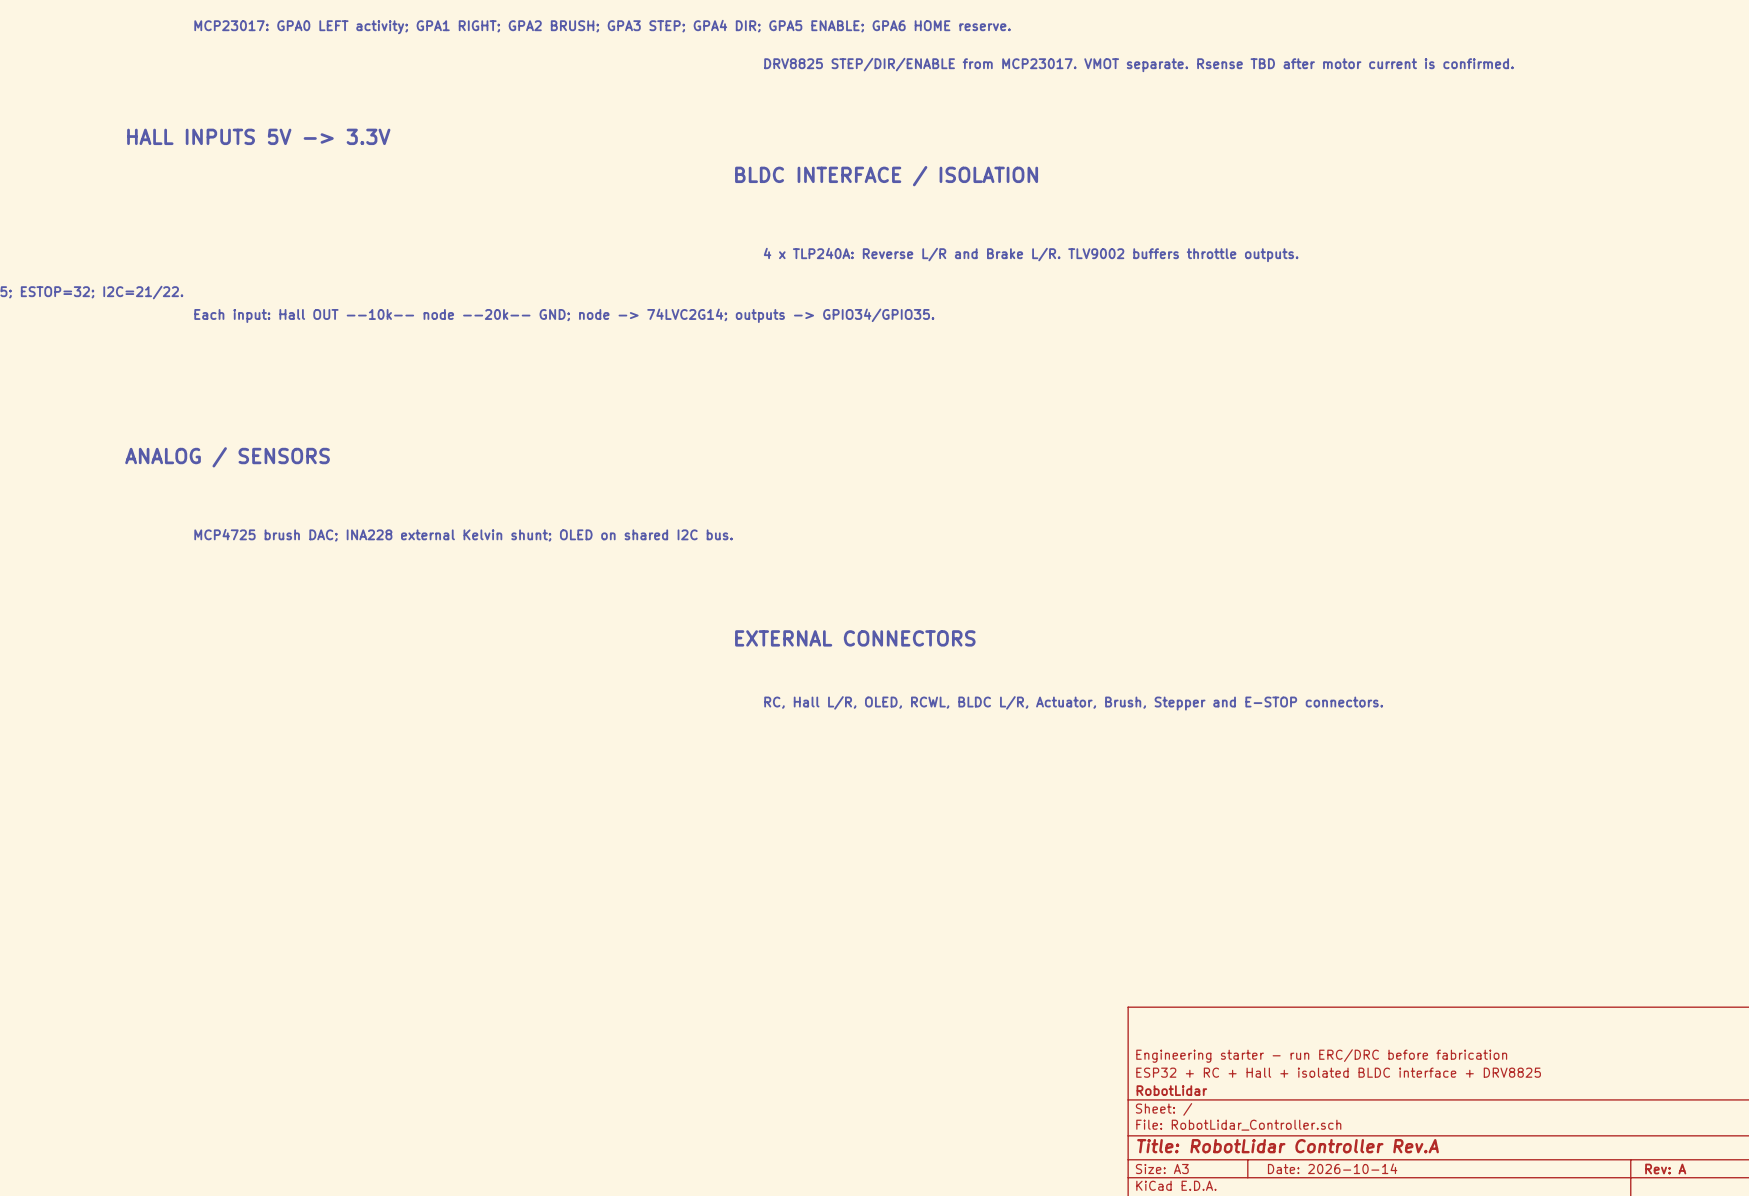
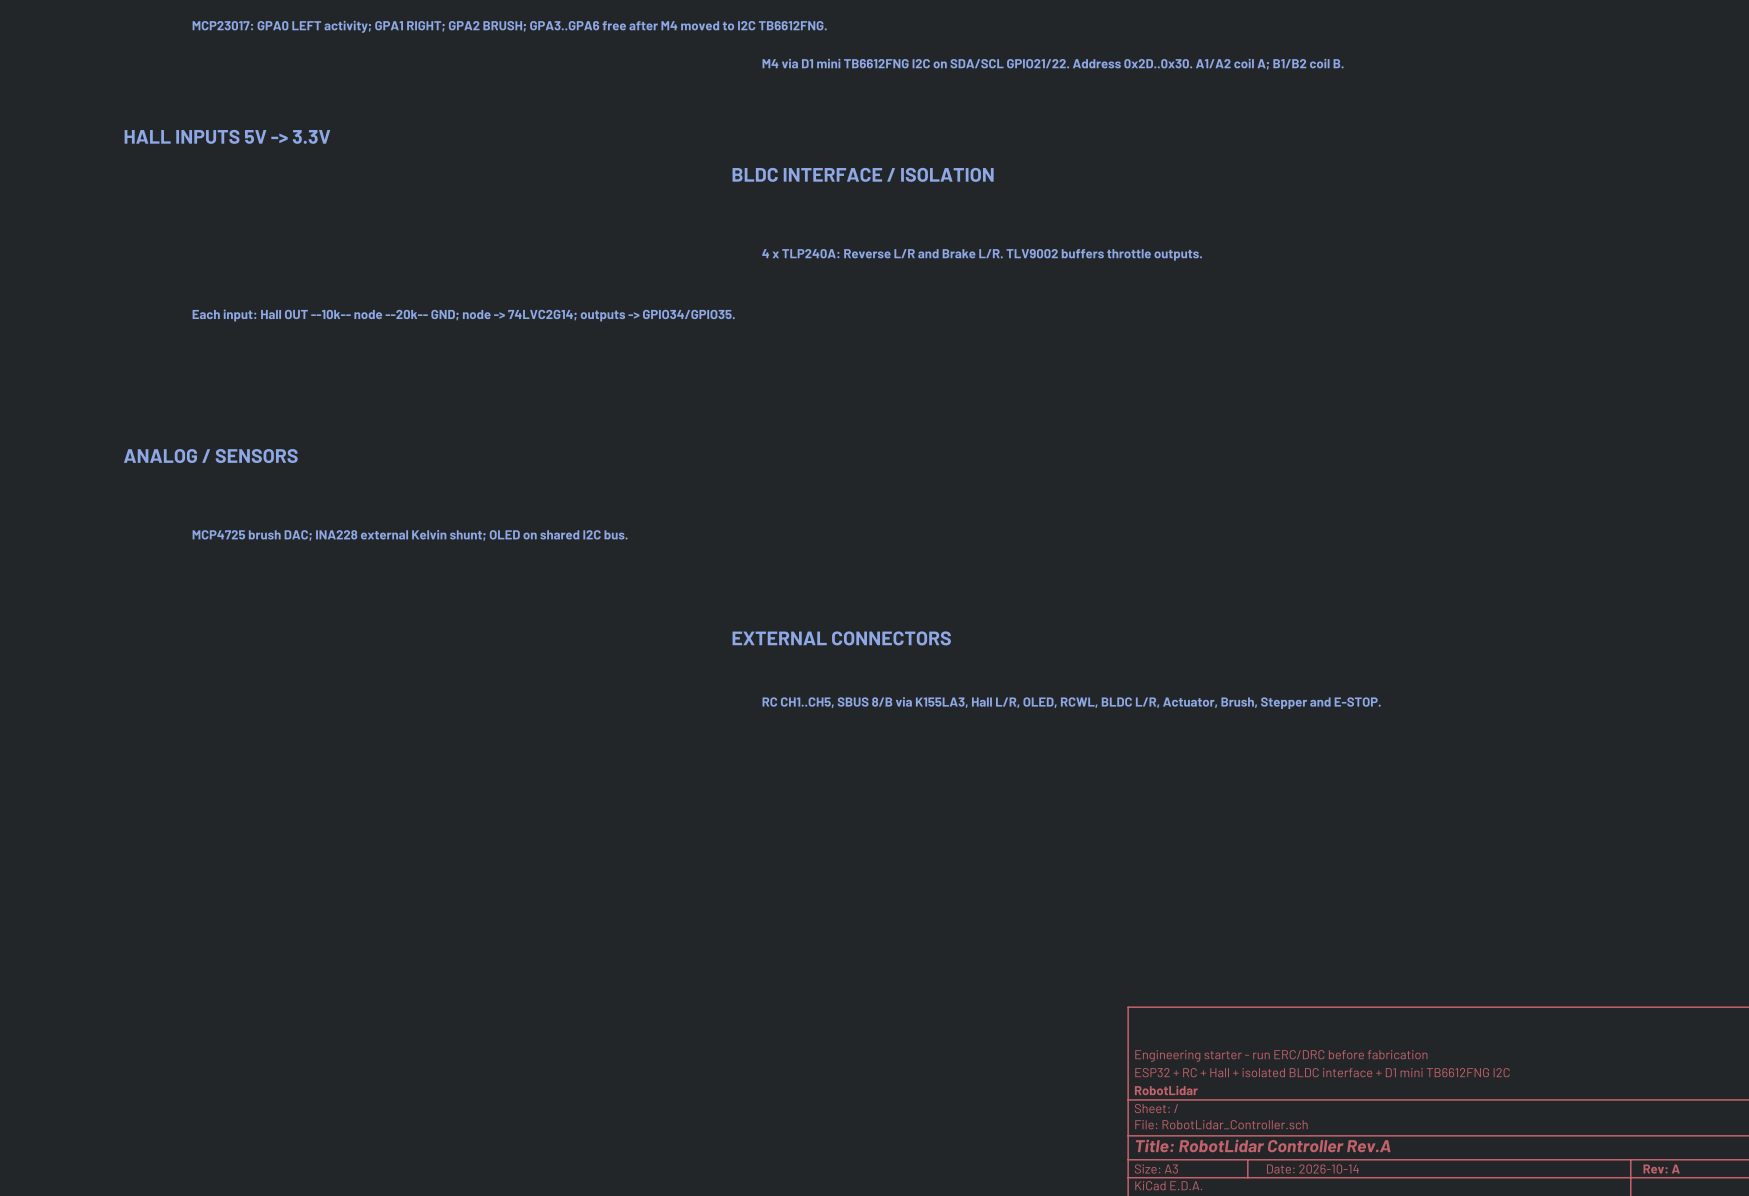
text: MCP23017: GPA0 LEFT activity; GPA1 RIGHT; GPA2 BRUSH; GPA3 STEP; GPA4 DIR; GPA5 ENABLE; GPA6 HOME reserve. (602, 27) -> MCP23017: GPA0 LEFT activity; GPA1 RIGHT; GPA2 BRUSH; GPA3..GPA6 free after M4 moved to I2C TB6612FNG. (509, 26)
text: DRV8825 STEP/DIR/ENABLE from MCP23017. VMOT separate. Rsense TBD after motor current is confirmed. (1139, 65) -> M4 via D1 mini TB6612FNG I2C on SDA/SCL GPIO21/22. Address 0x2D..0x30. A1/A2 coil A; B1/B2 coil B. (1053, 64)
text: RC, Hall L/R, OLED, RCWL, BLDC L/R, Actuator, Brush, Stepper and E-STOP connectors. (1073, 703) -> RC CH1..CH5, SBUS 8/B via K155LA3, Hall L/R, OLED, RCWL, BLDC L/R, Actuator, Brush, Stepper and E-STOP. (1071, 703)
title block: ESP32 + RC + Hall + isolated BLDC interface + DRV8825 (1338, 1072) -> ESP32 + RC + Hall + isolated BLDC interface + D1 mini TB6612FNG I2C (1322, 1072)

